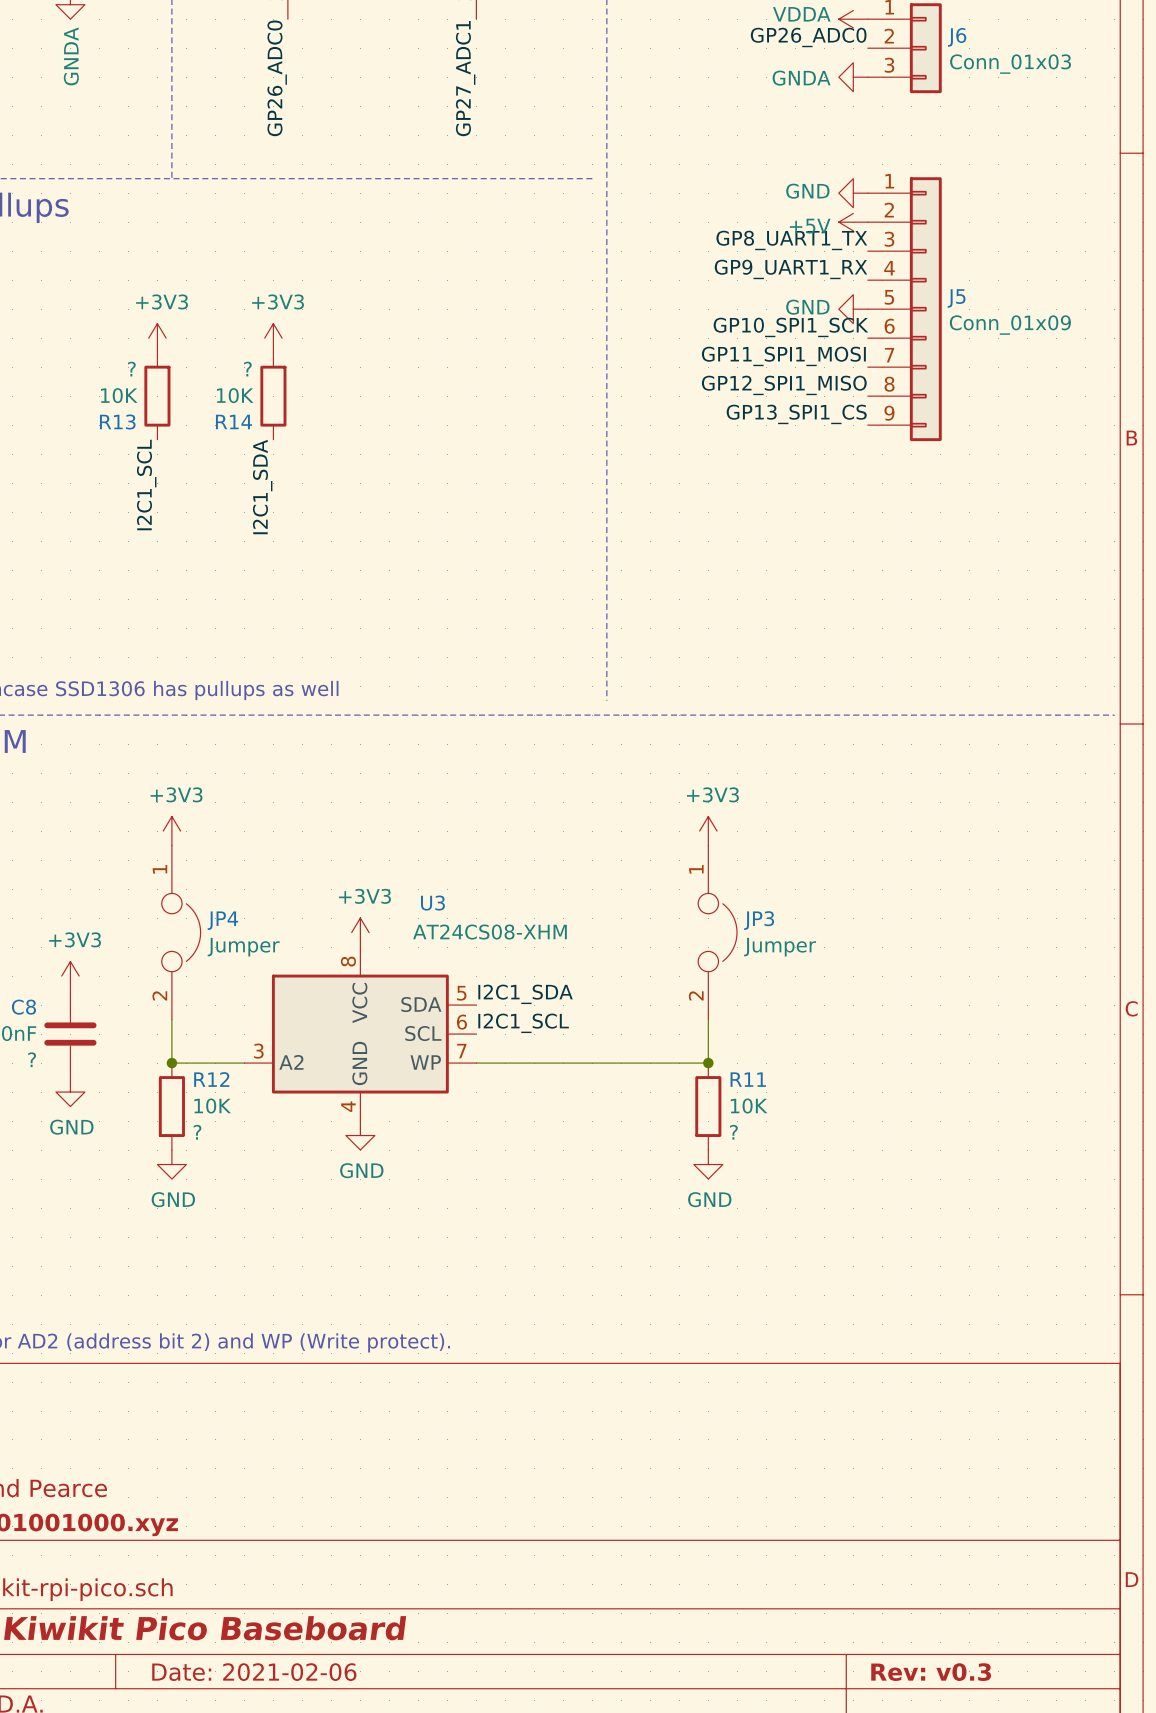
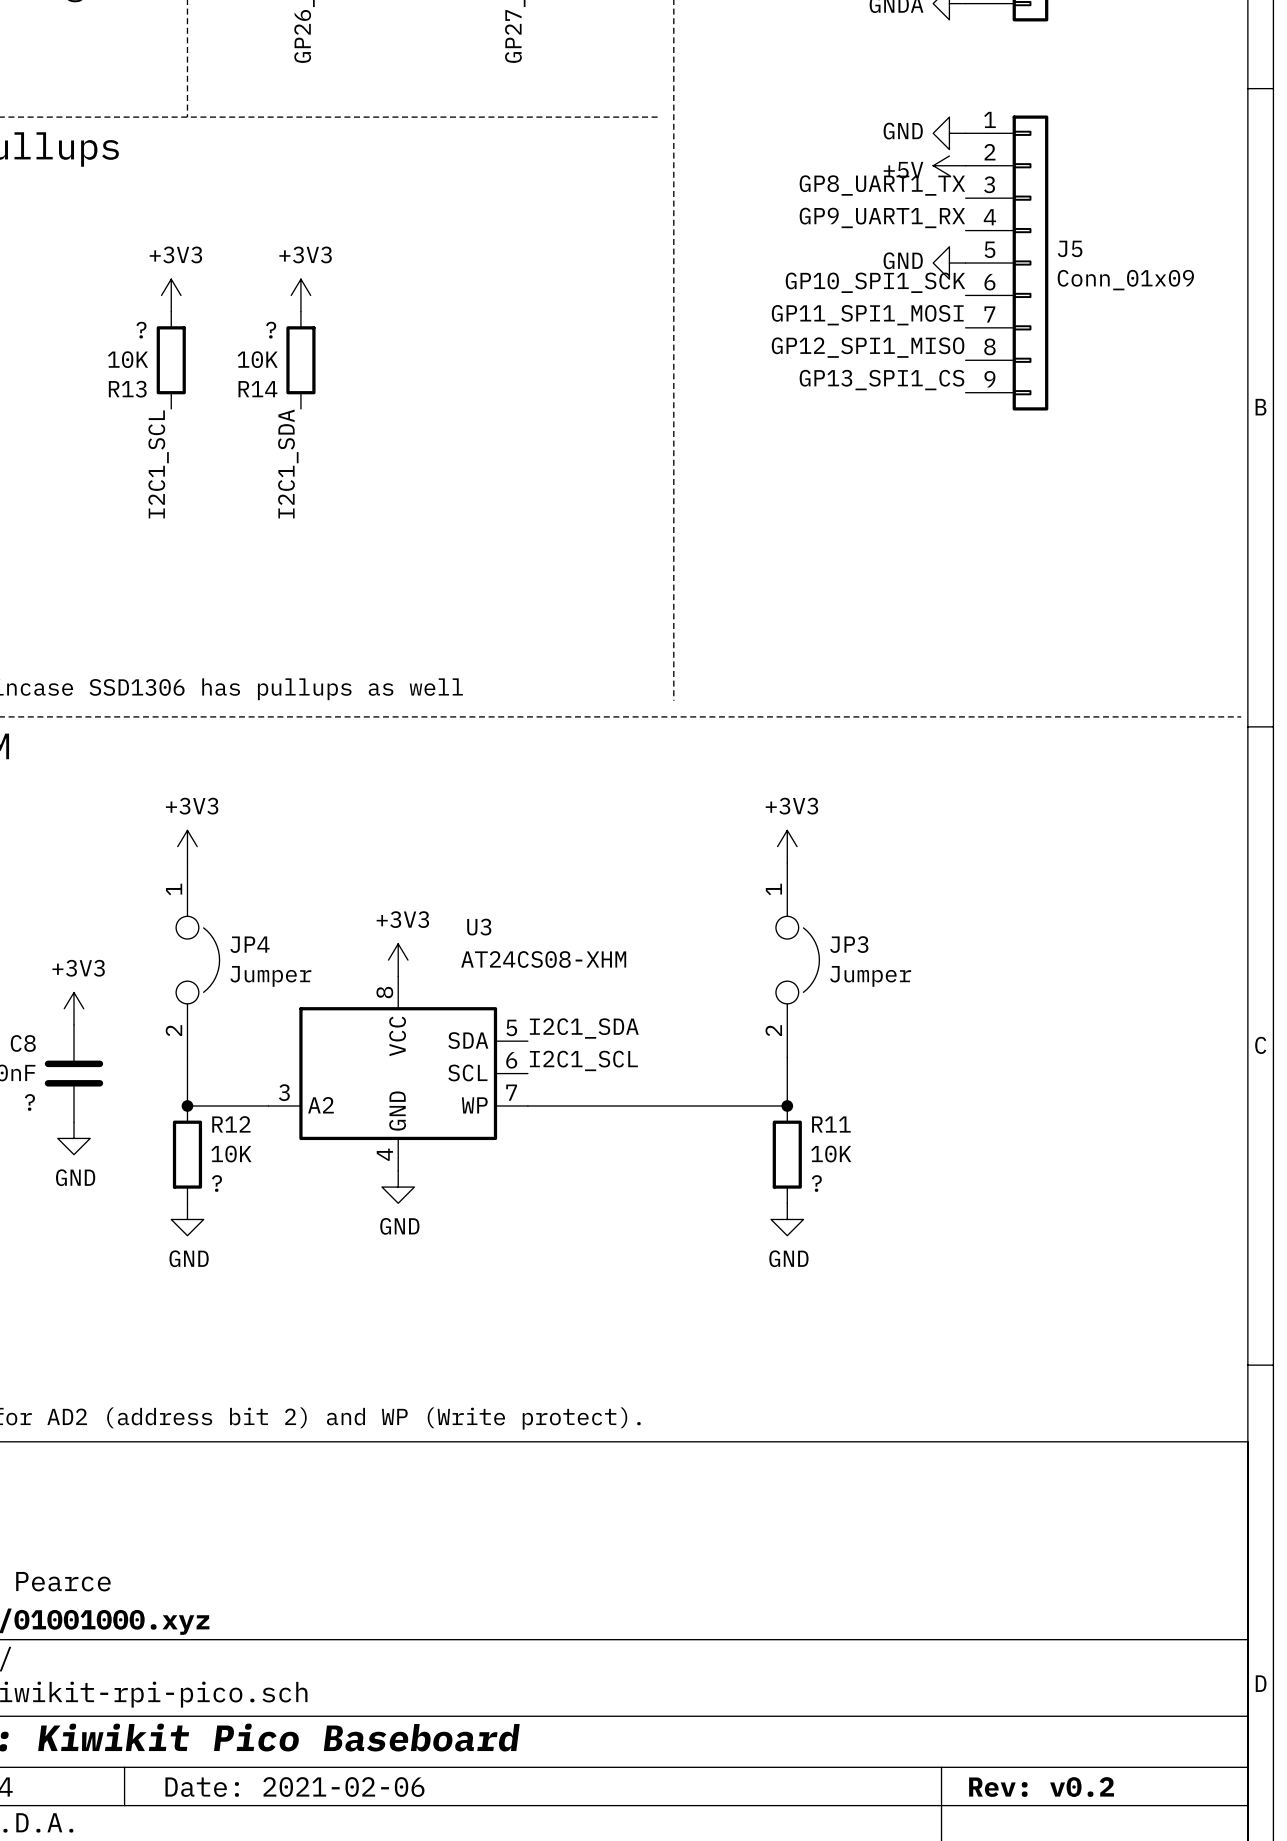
title block: Rev: v0.3 (931, 1672) -> Rev: v0.2 (1041, 1787)

